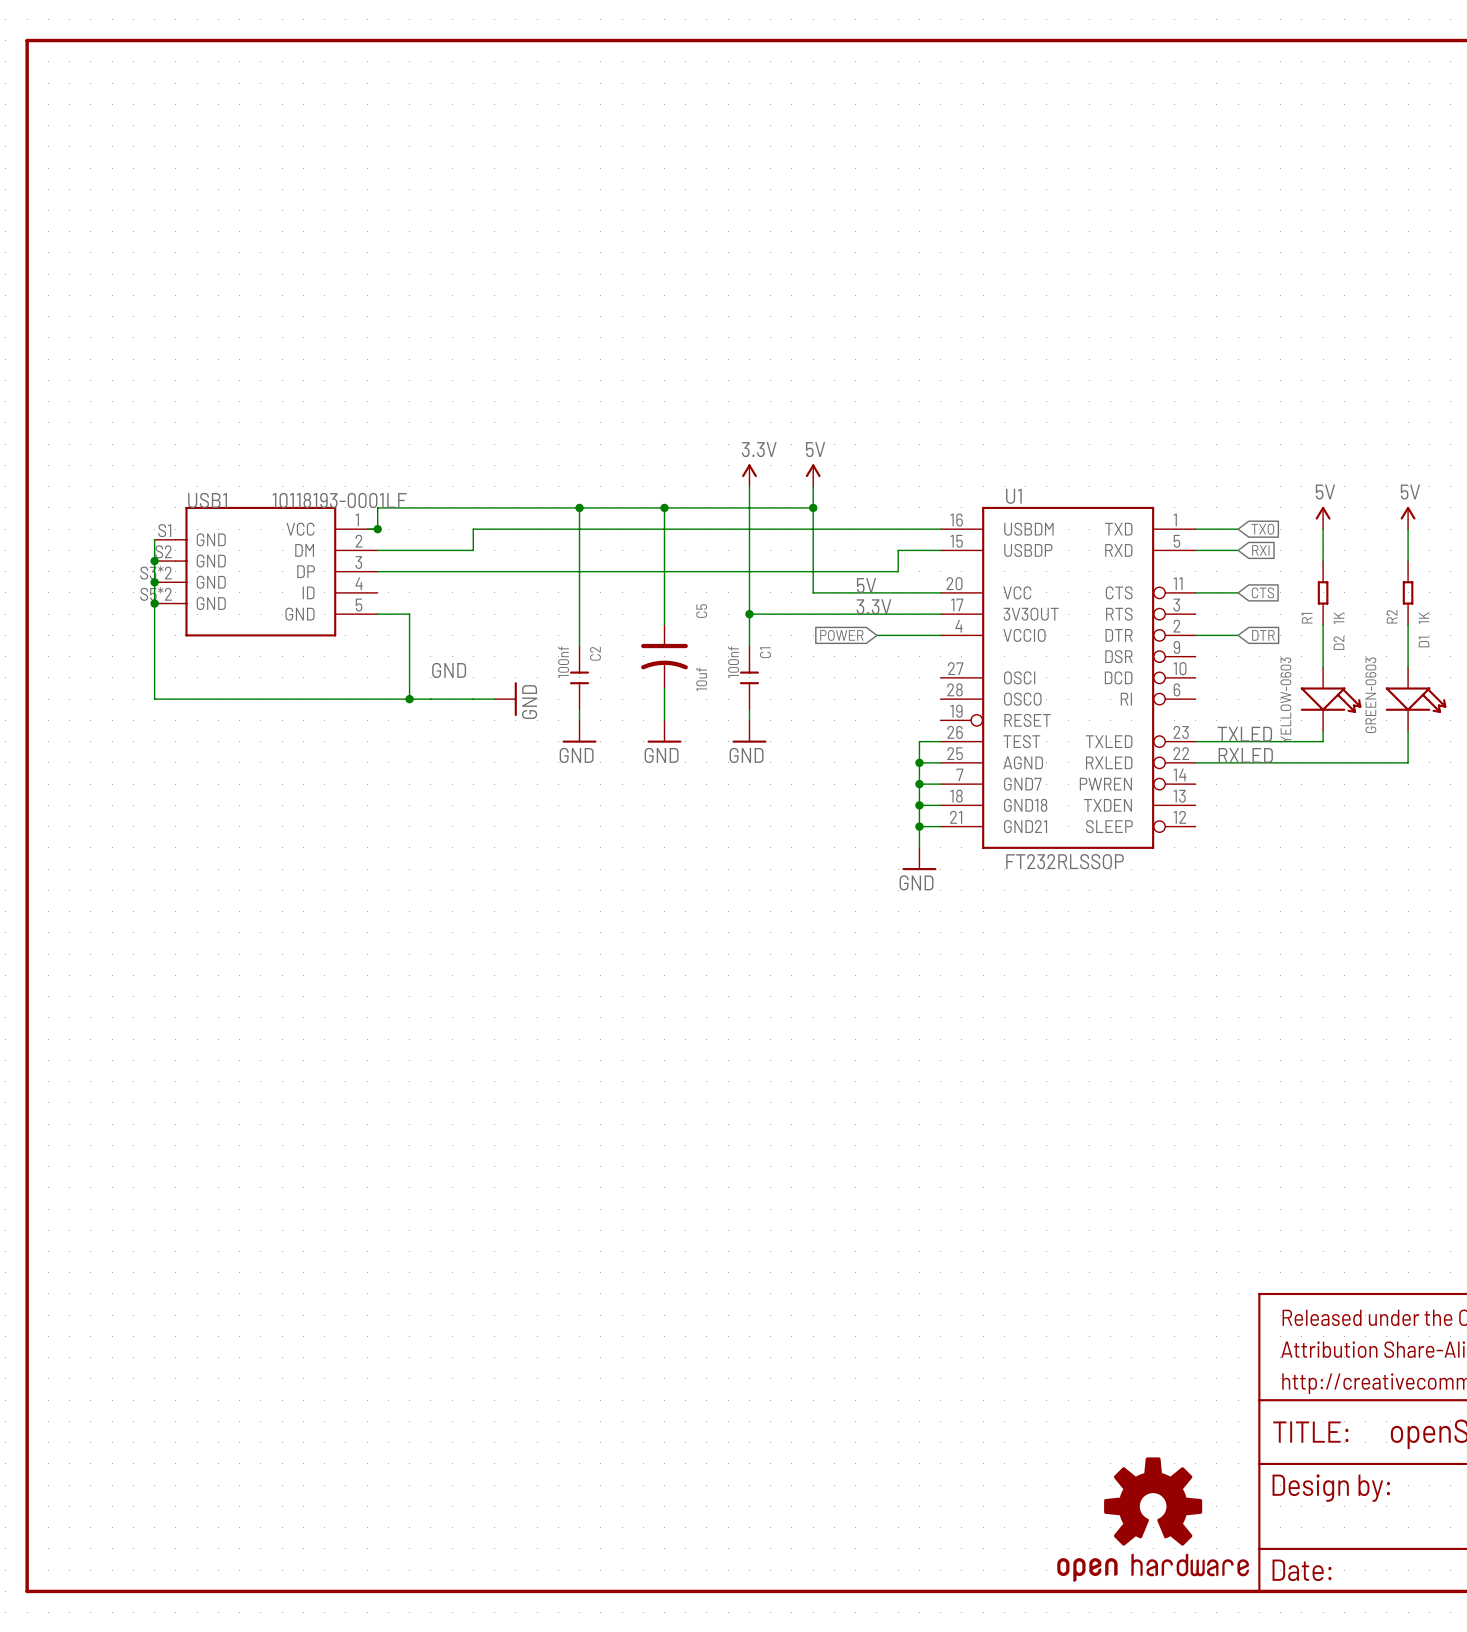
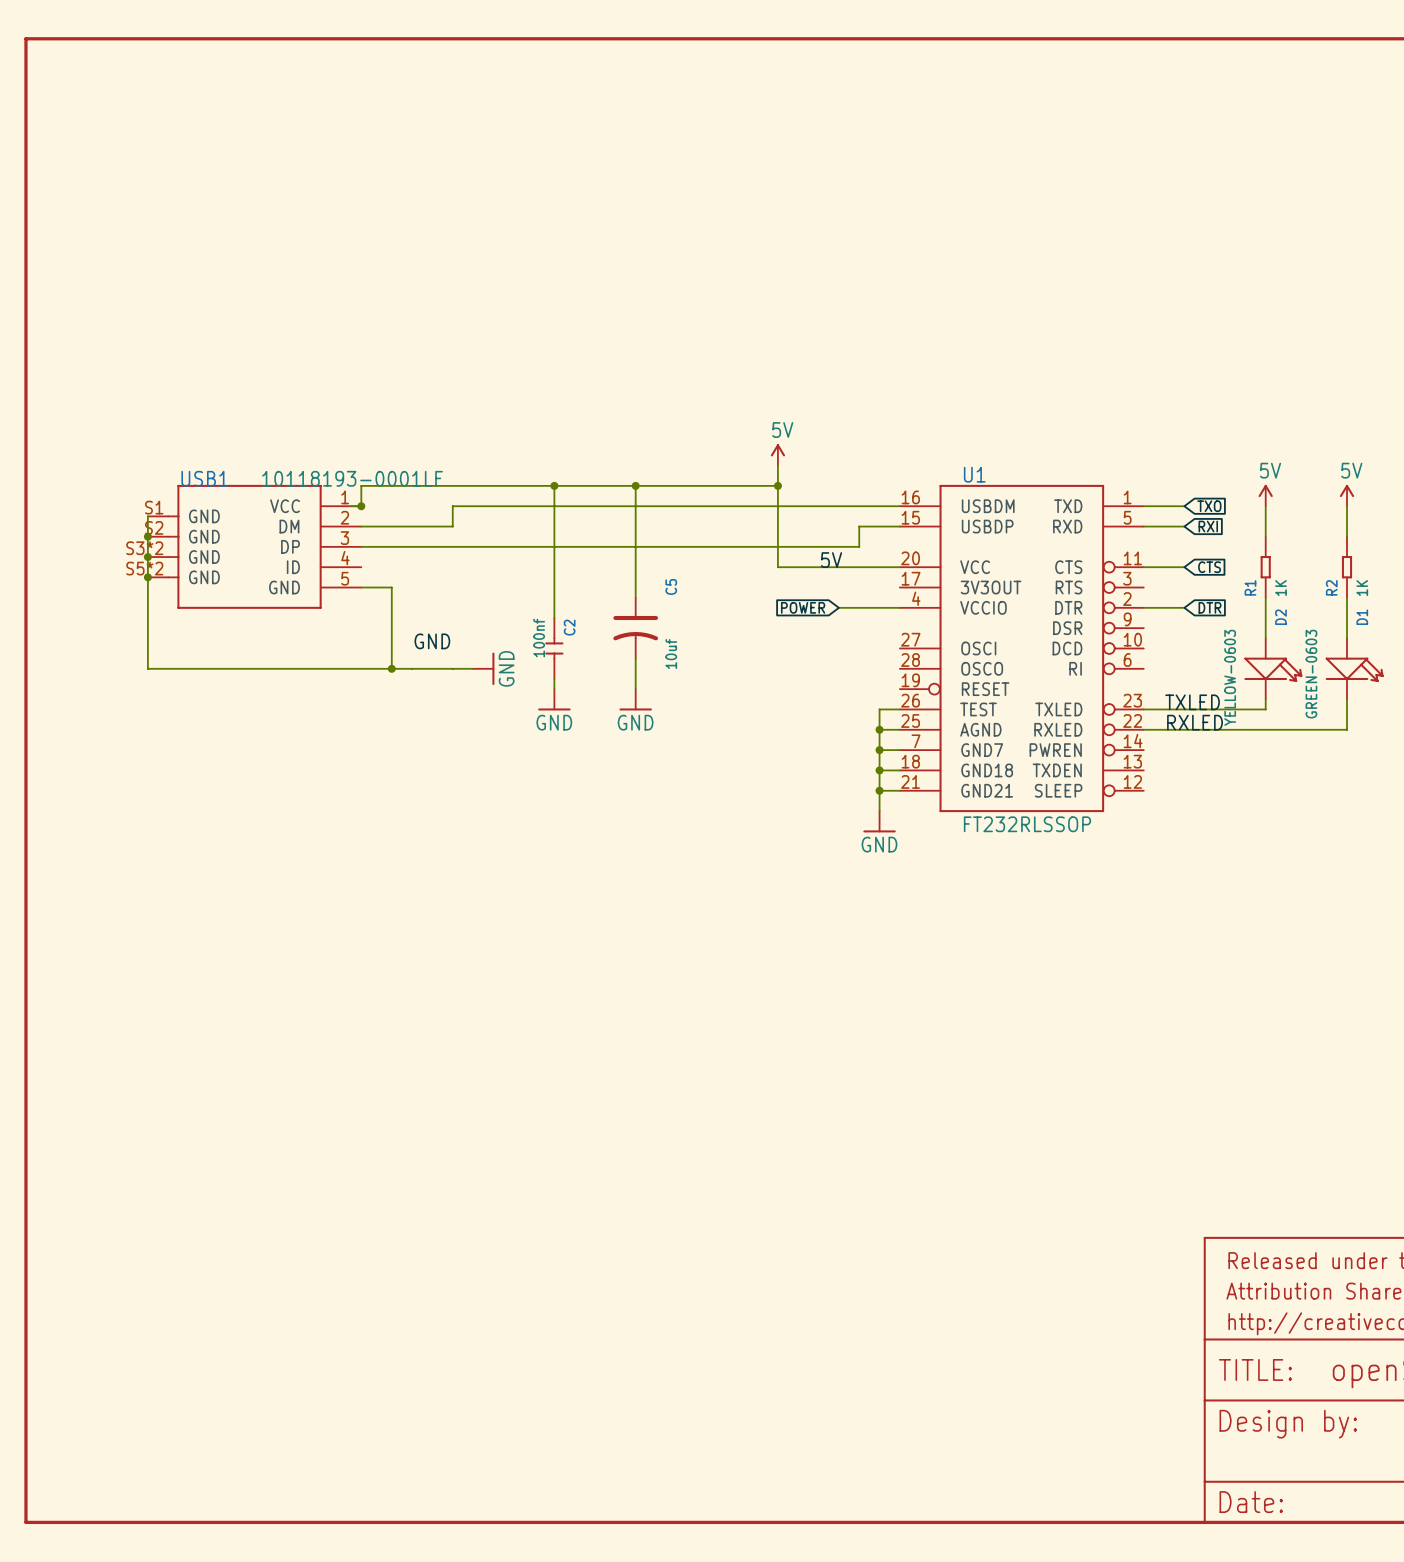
power symbol: 3.3V (749, 475) -> none
wire: (749, 486) (749, 646) -> none
label: 3.3V (874, 606) -> none
wire: (749, 614) (940, 614) -> none
junction: (749, 614) -> none
C1: 100nf (749, 677) -> none
wire: (749, 709) (749, 720) -> none
power symbol: GND (749, 731) -> none
part: (1153, 1519) -> none

